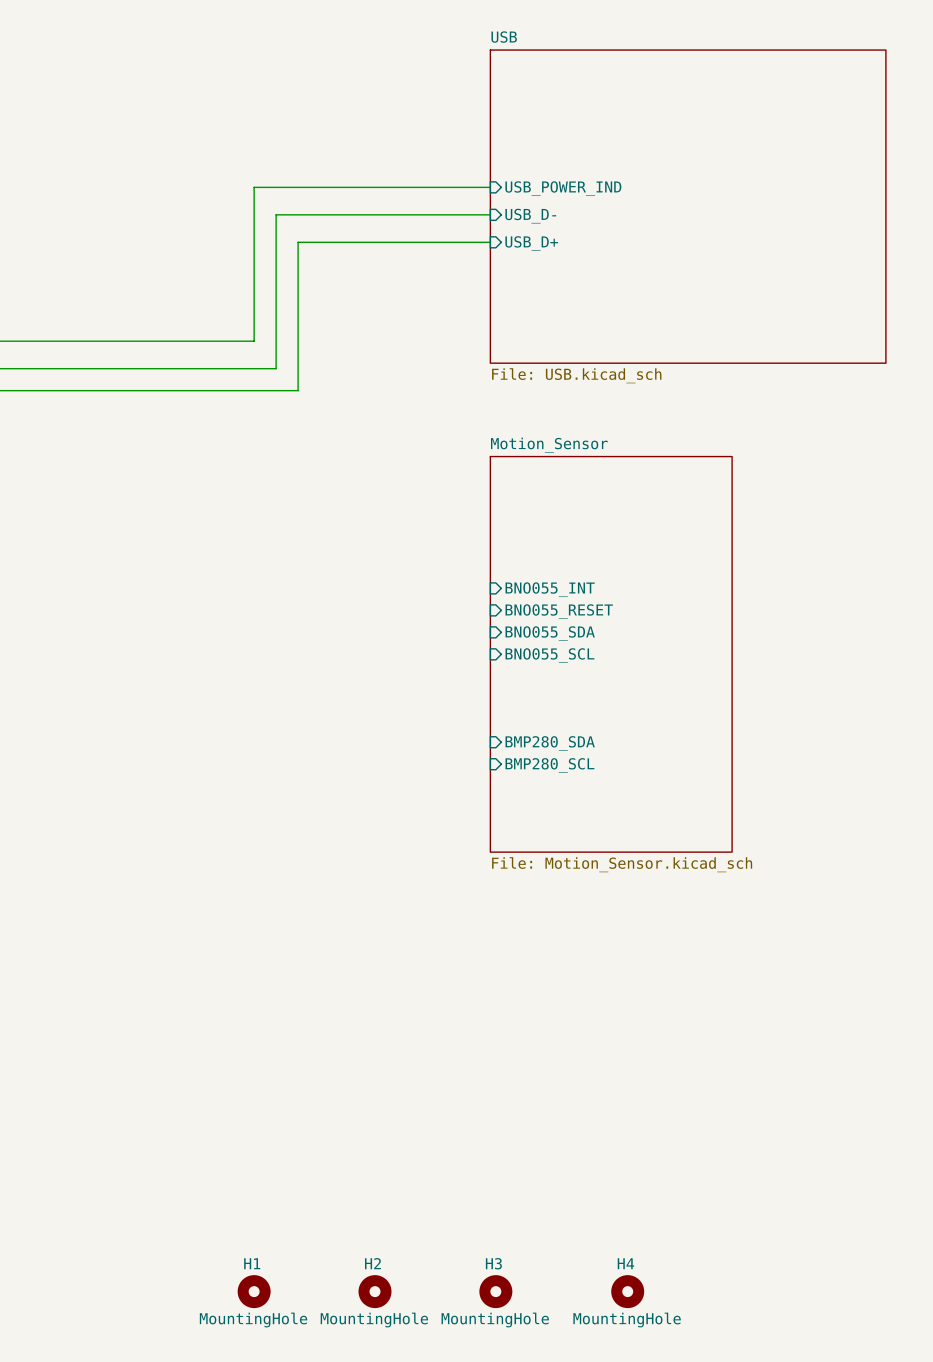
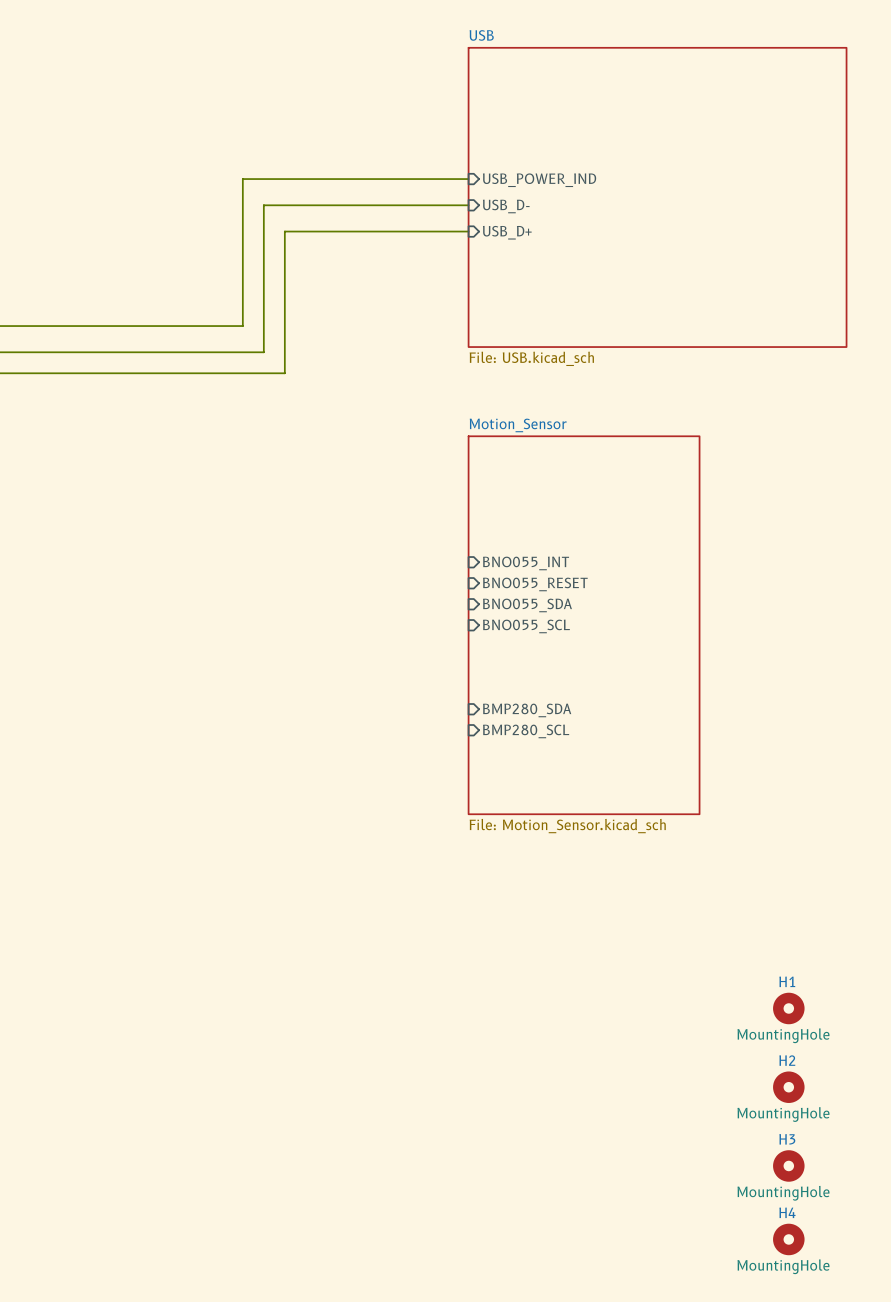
H1 position: (254, 1291) -> (788, 1008)
H2 position: (375, 1291) -> (788, 1087)
H3 position: (495, 1291) -> (788, 1165)
H4 position: (627, 1291) -> (788, 1239)

